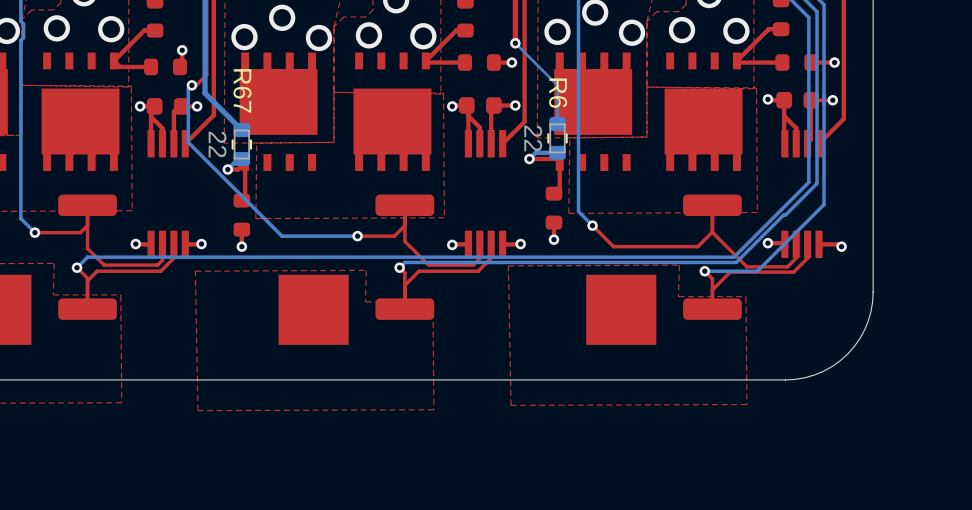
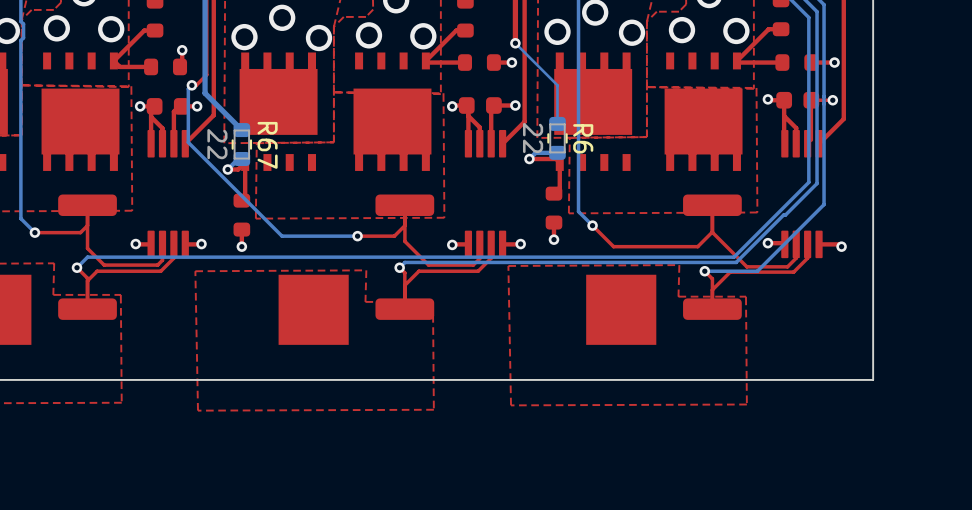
R67 name position: R67 (242, 90) -> R67 (267, 145)
R6 name position: R6 (558, 93) -> R6 (583, 138)
board edge: (873, 292) (870, 311) (864, 330) (847, 354) (823, 371) (804, 377) (785, 379) -> (873, 292) (873, 379) (785, 379)

